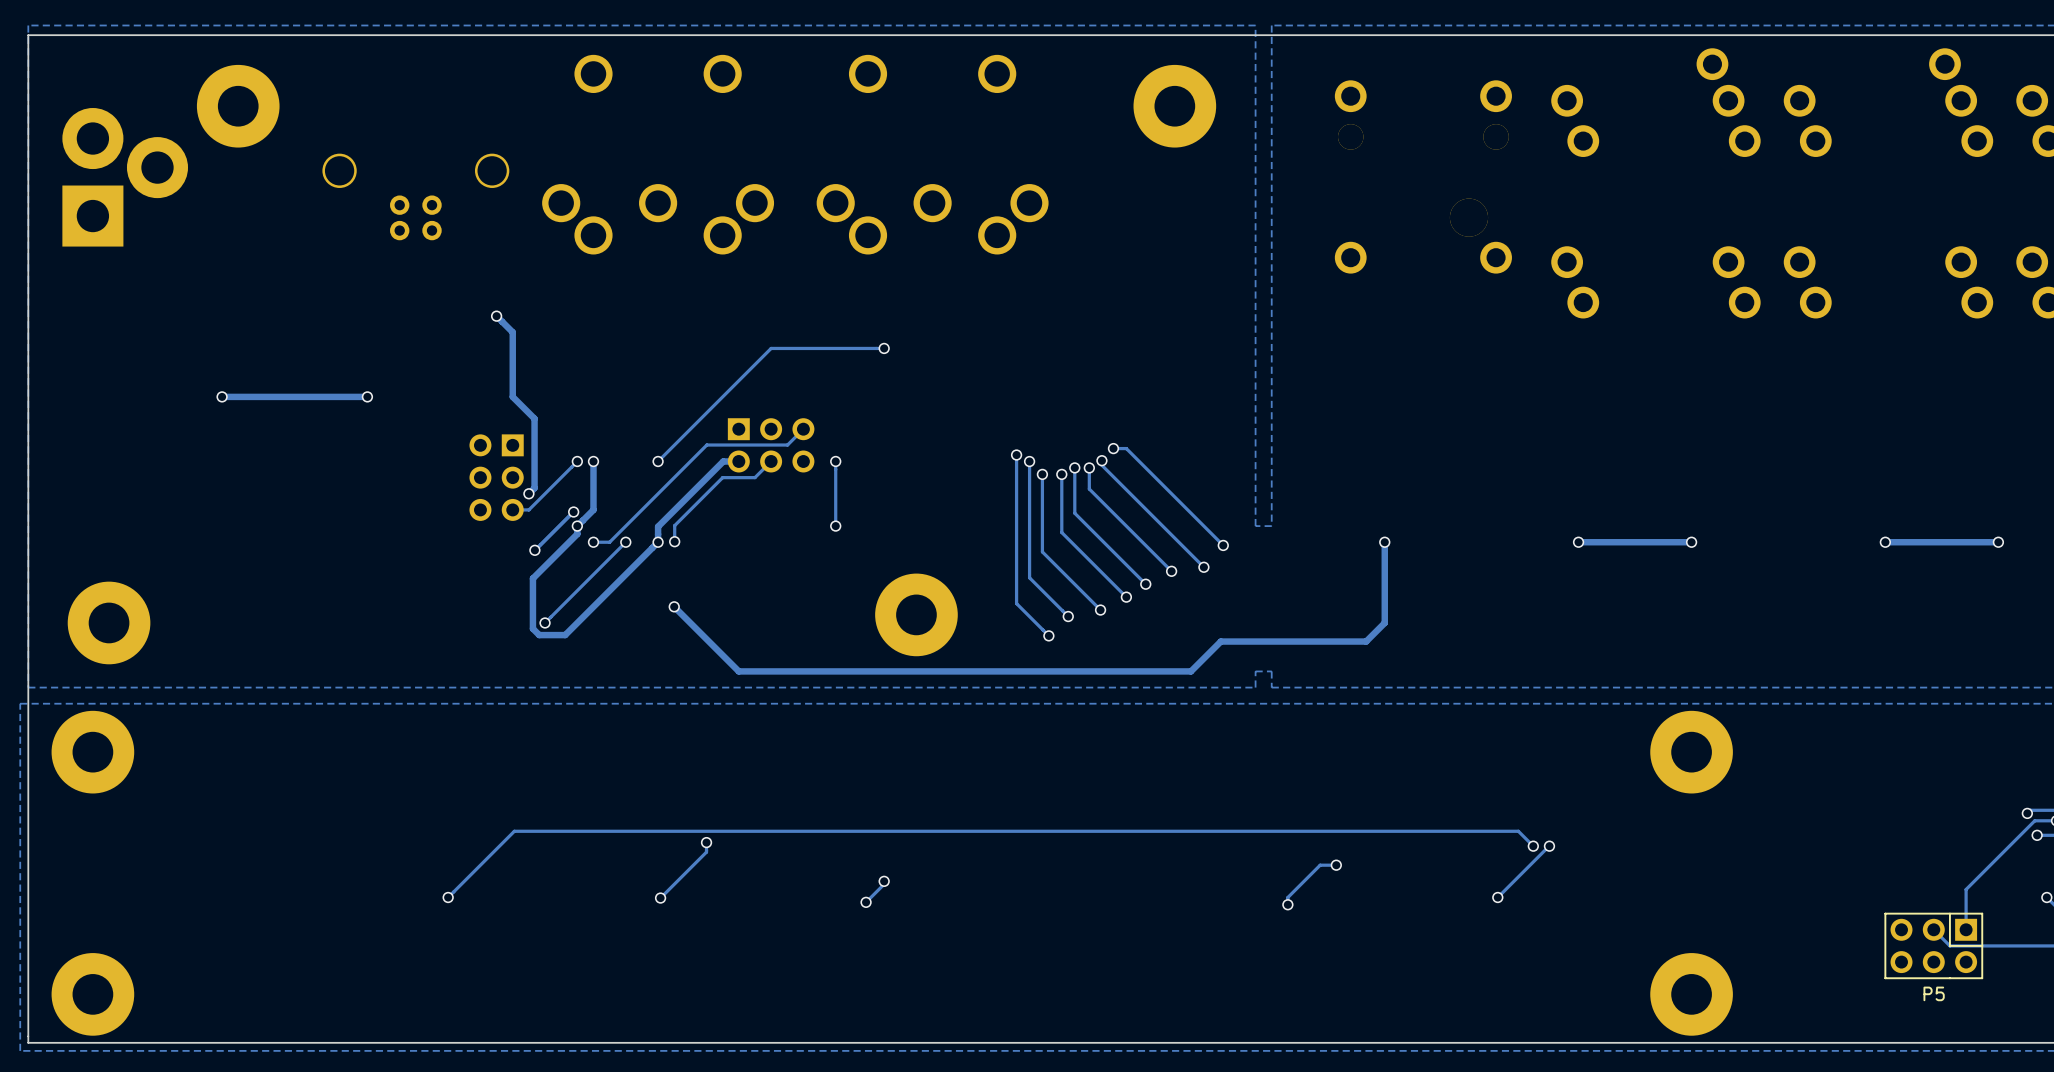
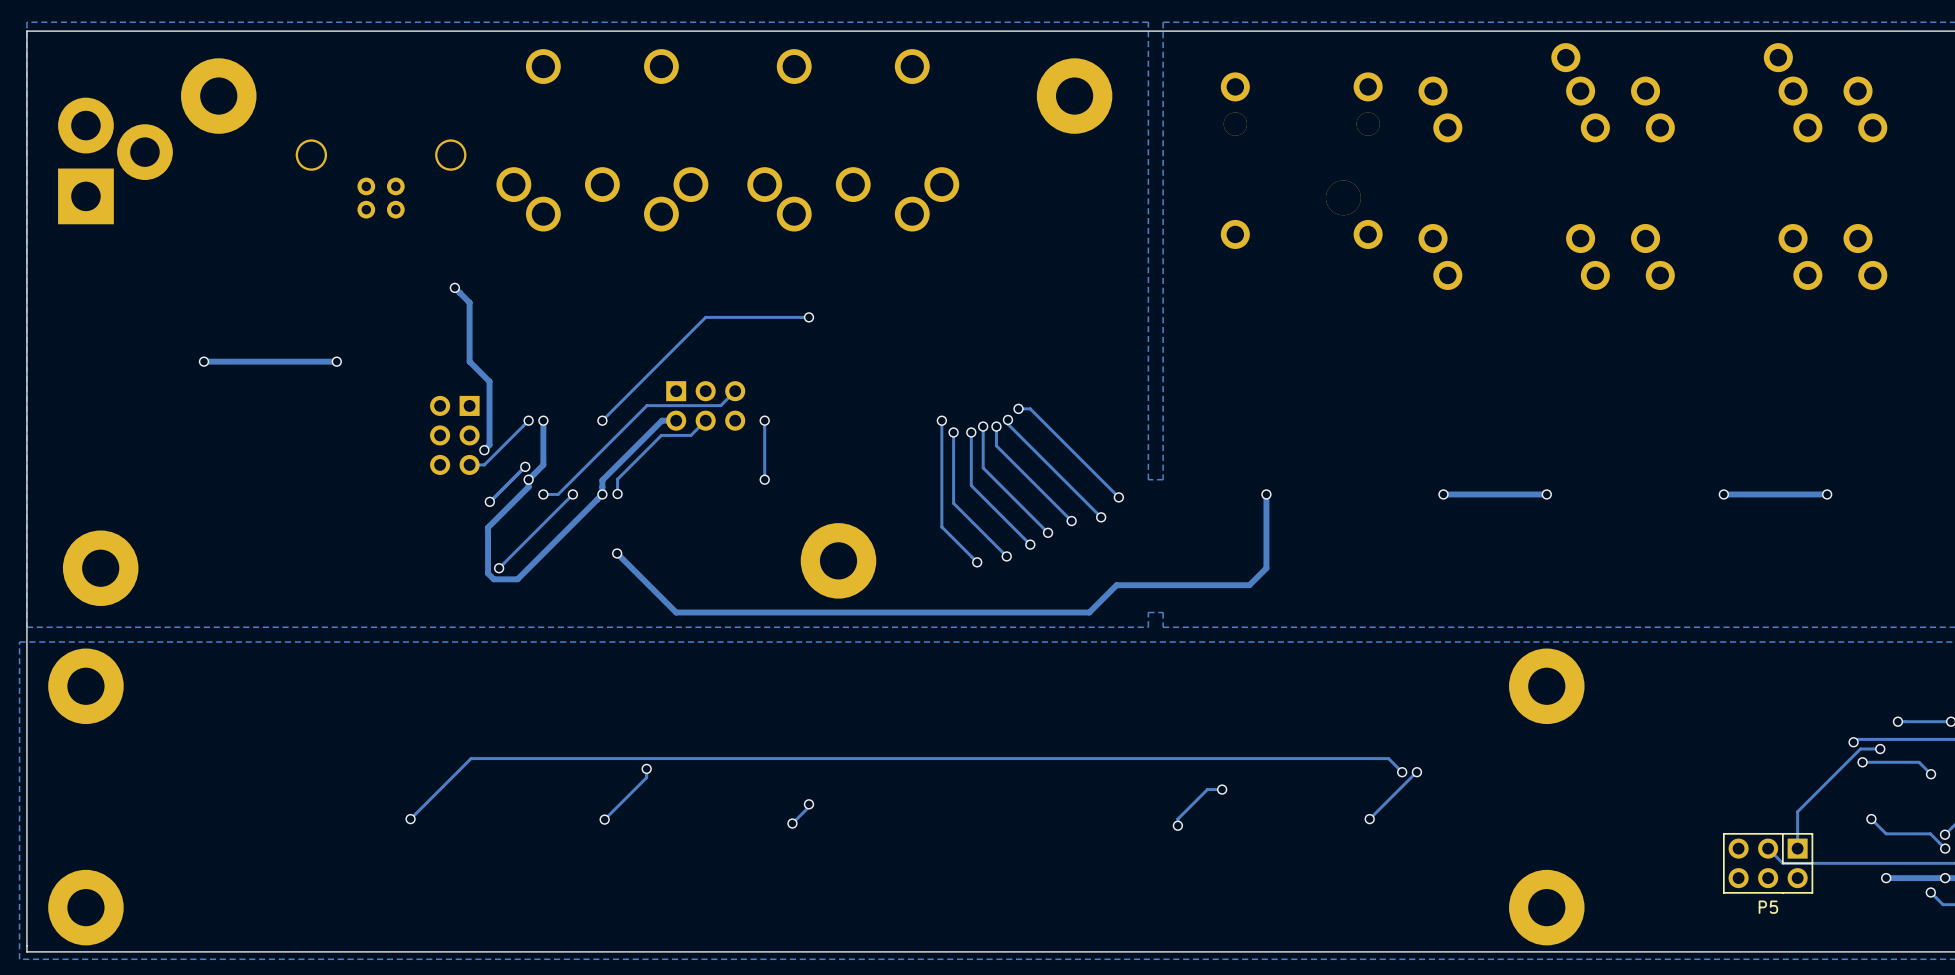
track: (1016, 455) (1016, 603) (1048, 635) -> none
via: (1016, 455) -> none
via: (1048, 635) -> none

